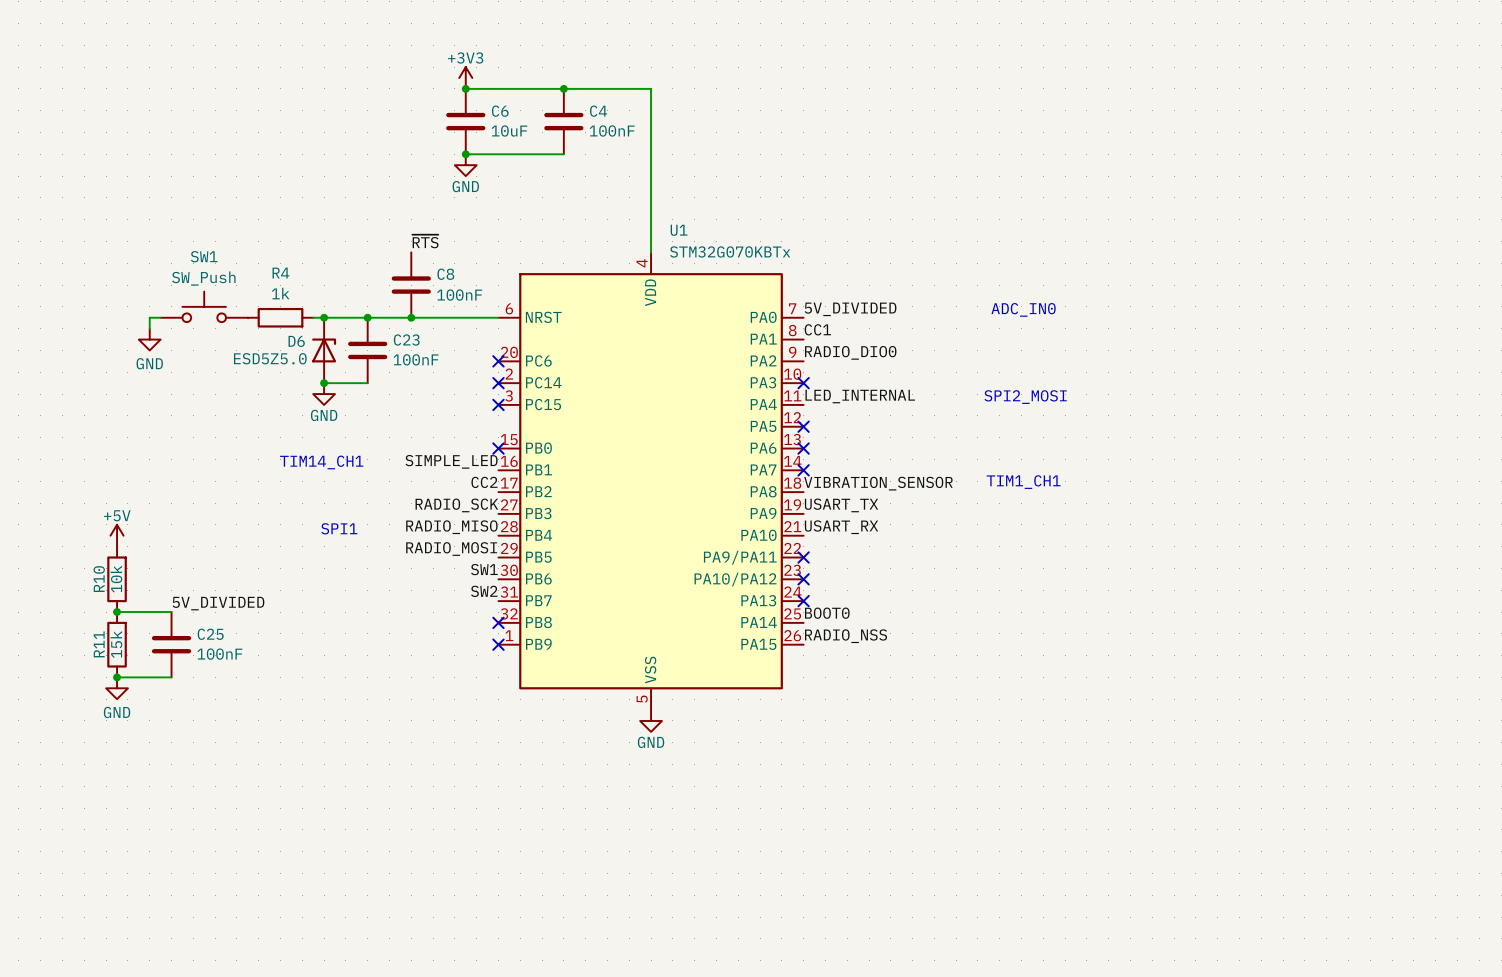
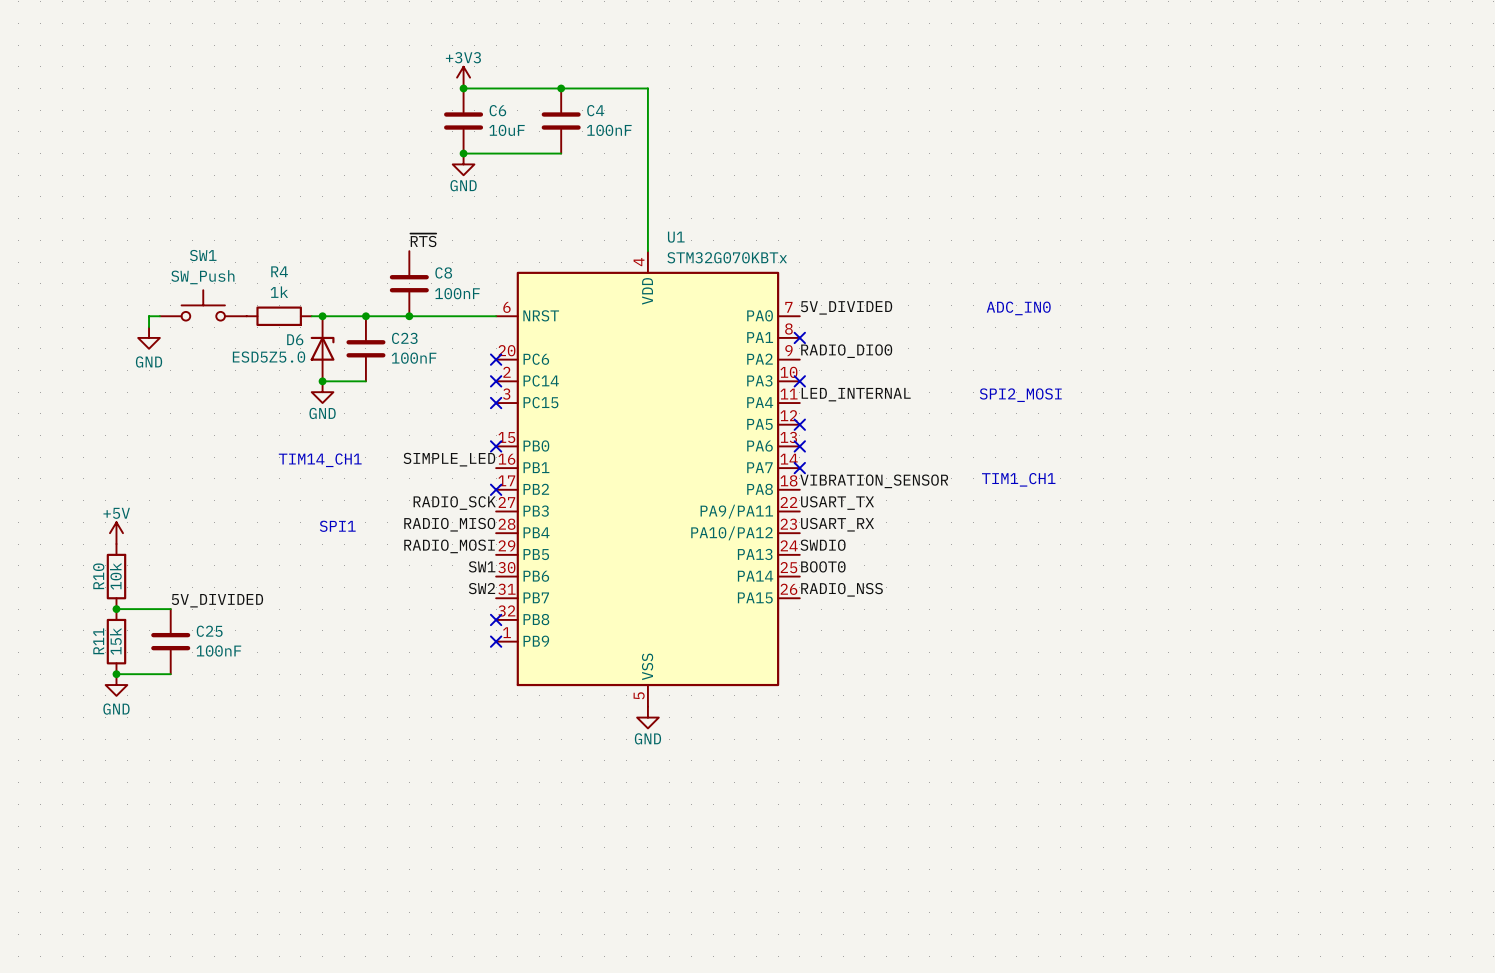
U1 symbol: [498, 252, 804, 711] -> [496, 251, 800, 707]
label: CC1 (817, 329) -> none
no-connect mark: none -> (799, 337)
label: CC2 (484, 482) -> none
no-connect mark: none -> (496, 489)
label: none -> SWDIO (823, 545)
no-connect mark: (803, 557) -> none
no-connect mark: (803, 579) -> none
no-connect mark: (803, 601) -> none
label position: BOOT0 (827, 613) -> BOOT0 (823, 566)
label position: RADIO_NSS (846, 636) -> RADIO_NSS (842, 589)

